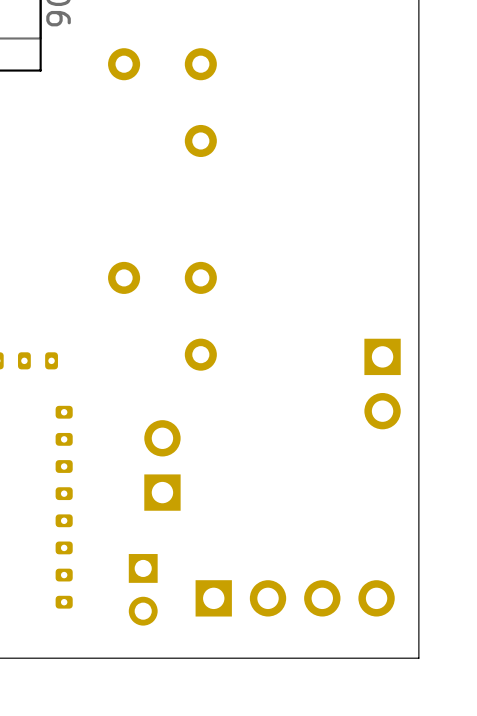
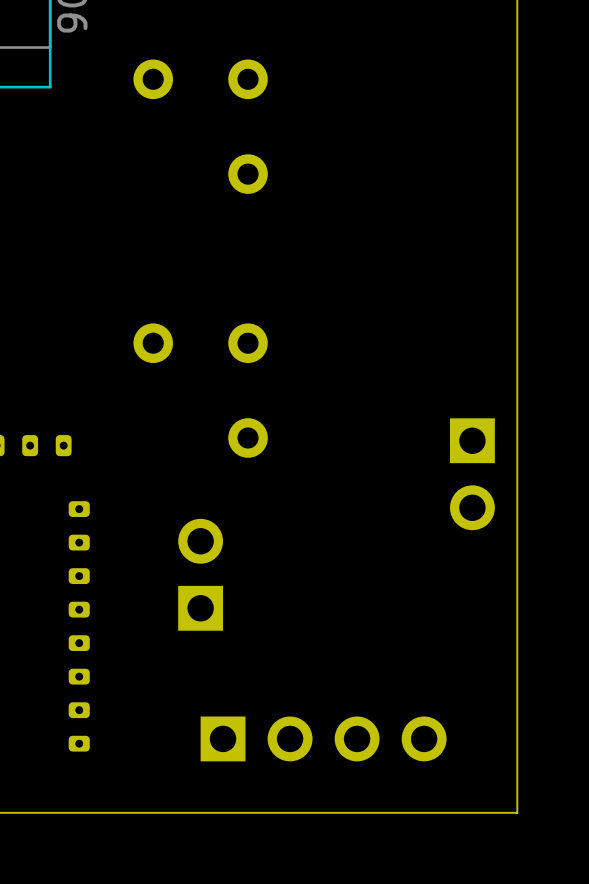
part: (143, 589) -> none
part position: (295, 598) -> (323, 738)

